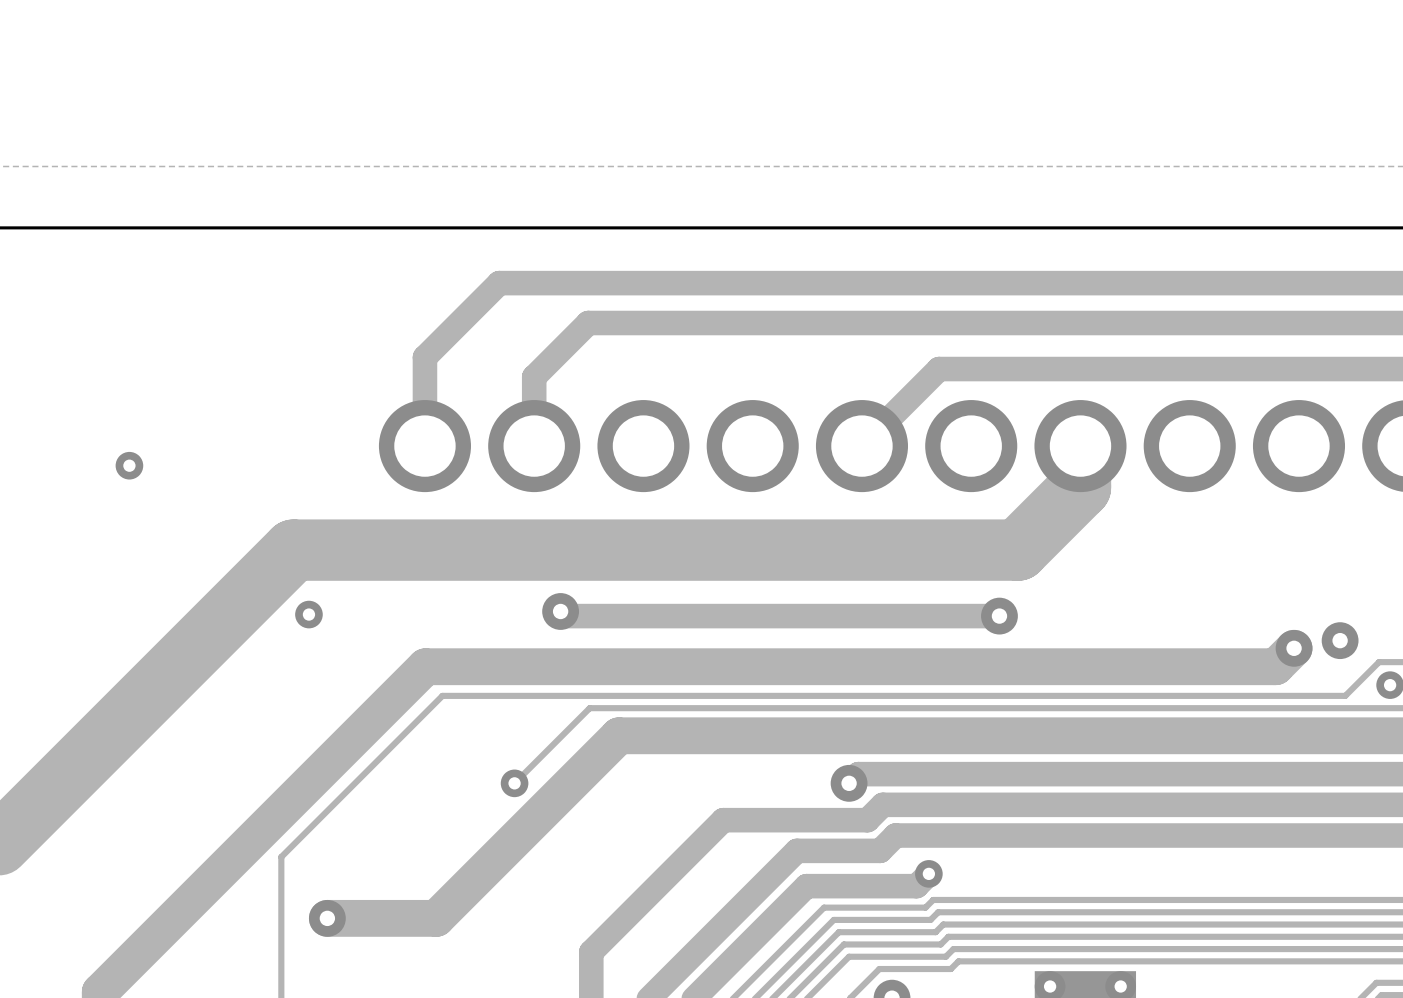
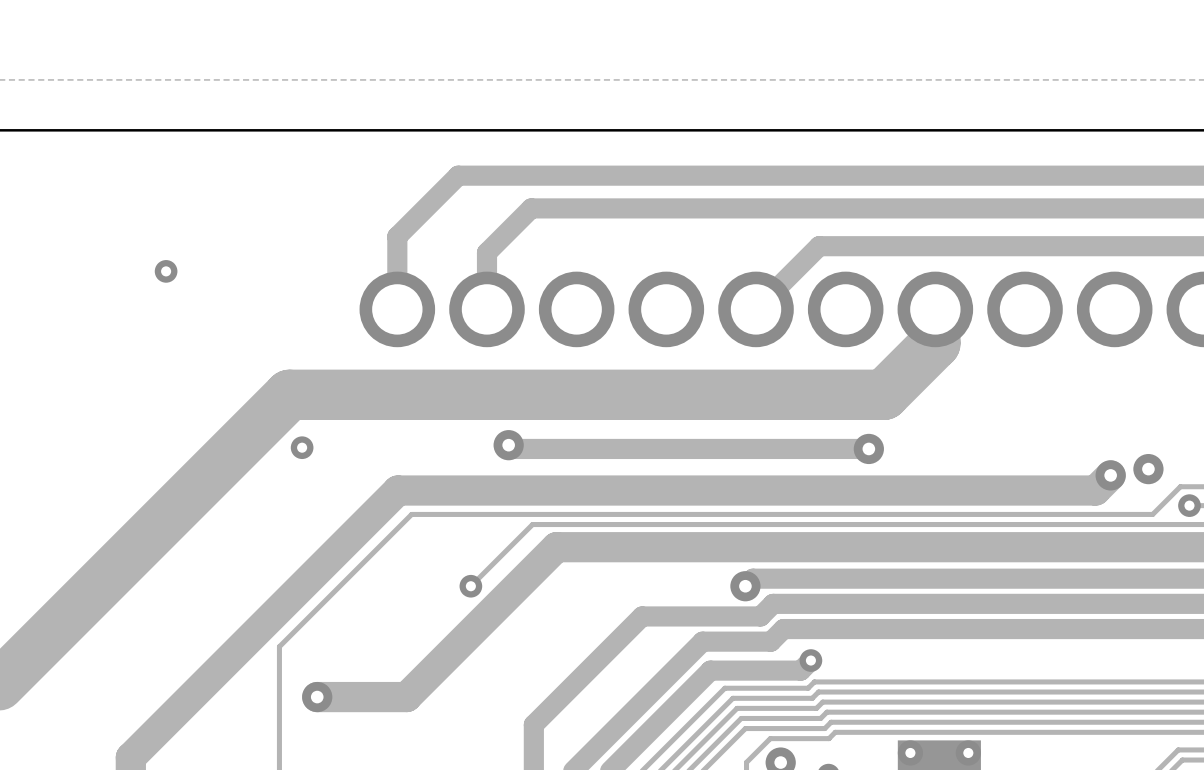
via position: (129, 465) -> (166, 271)

